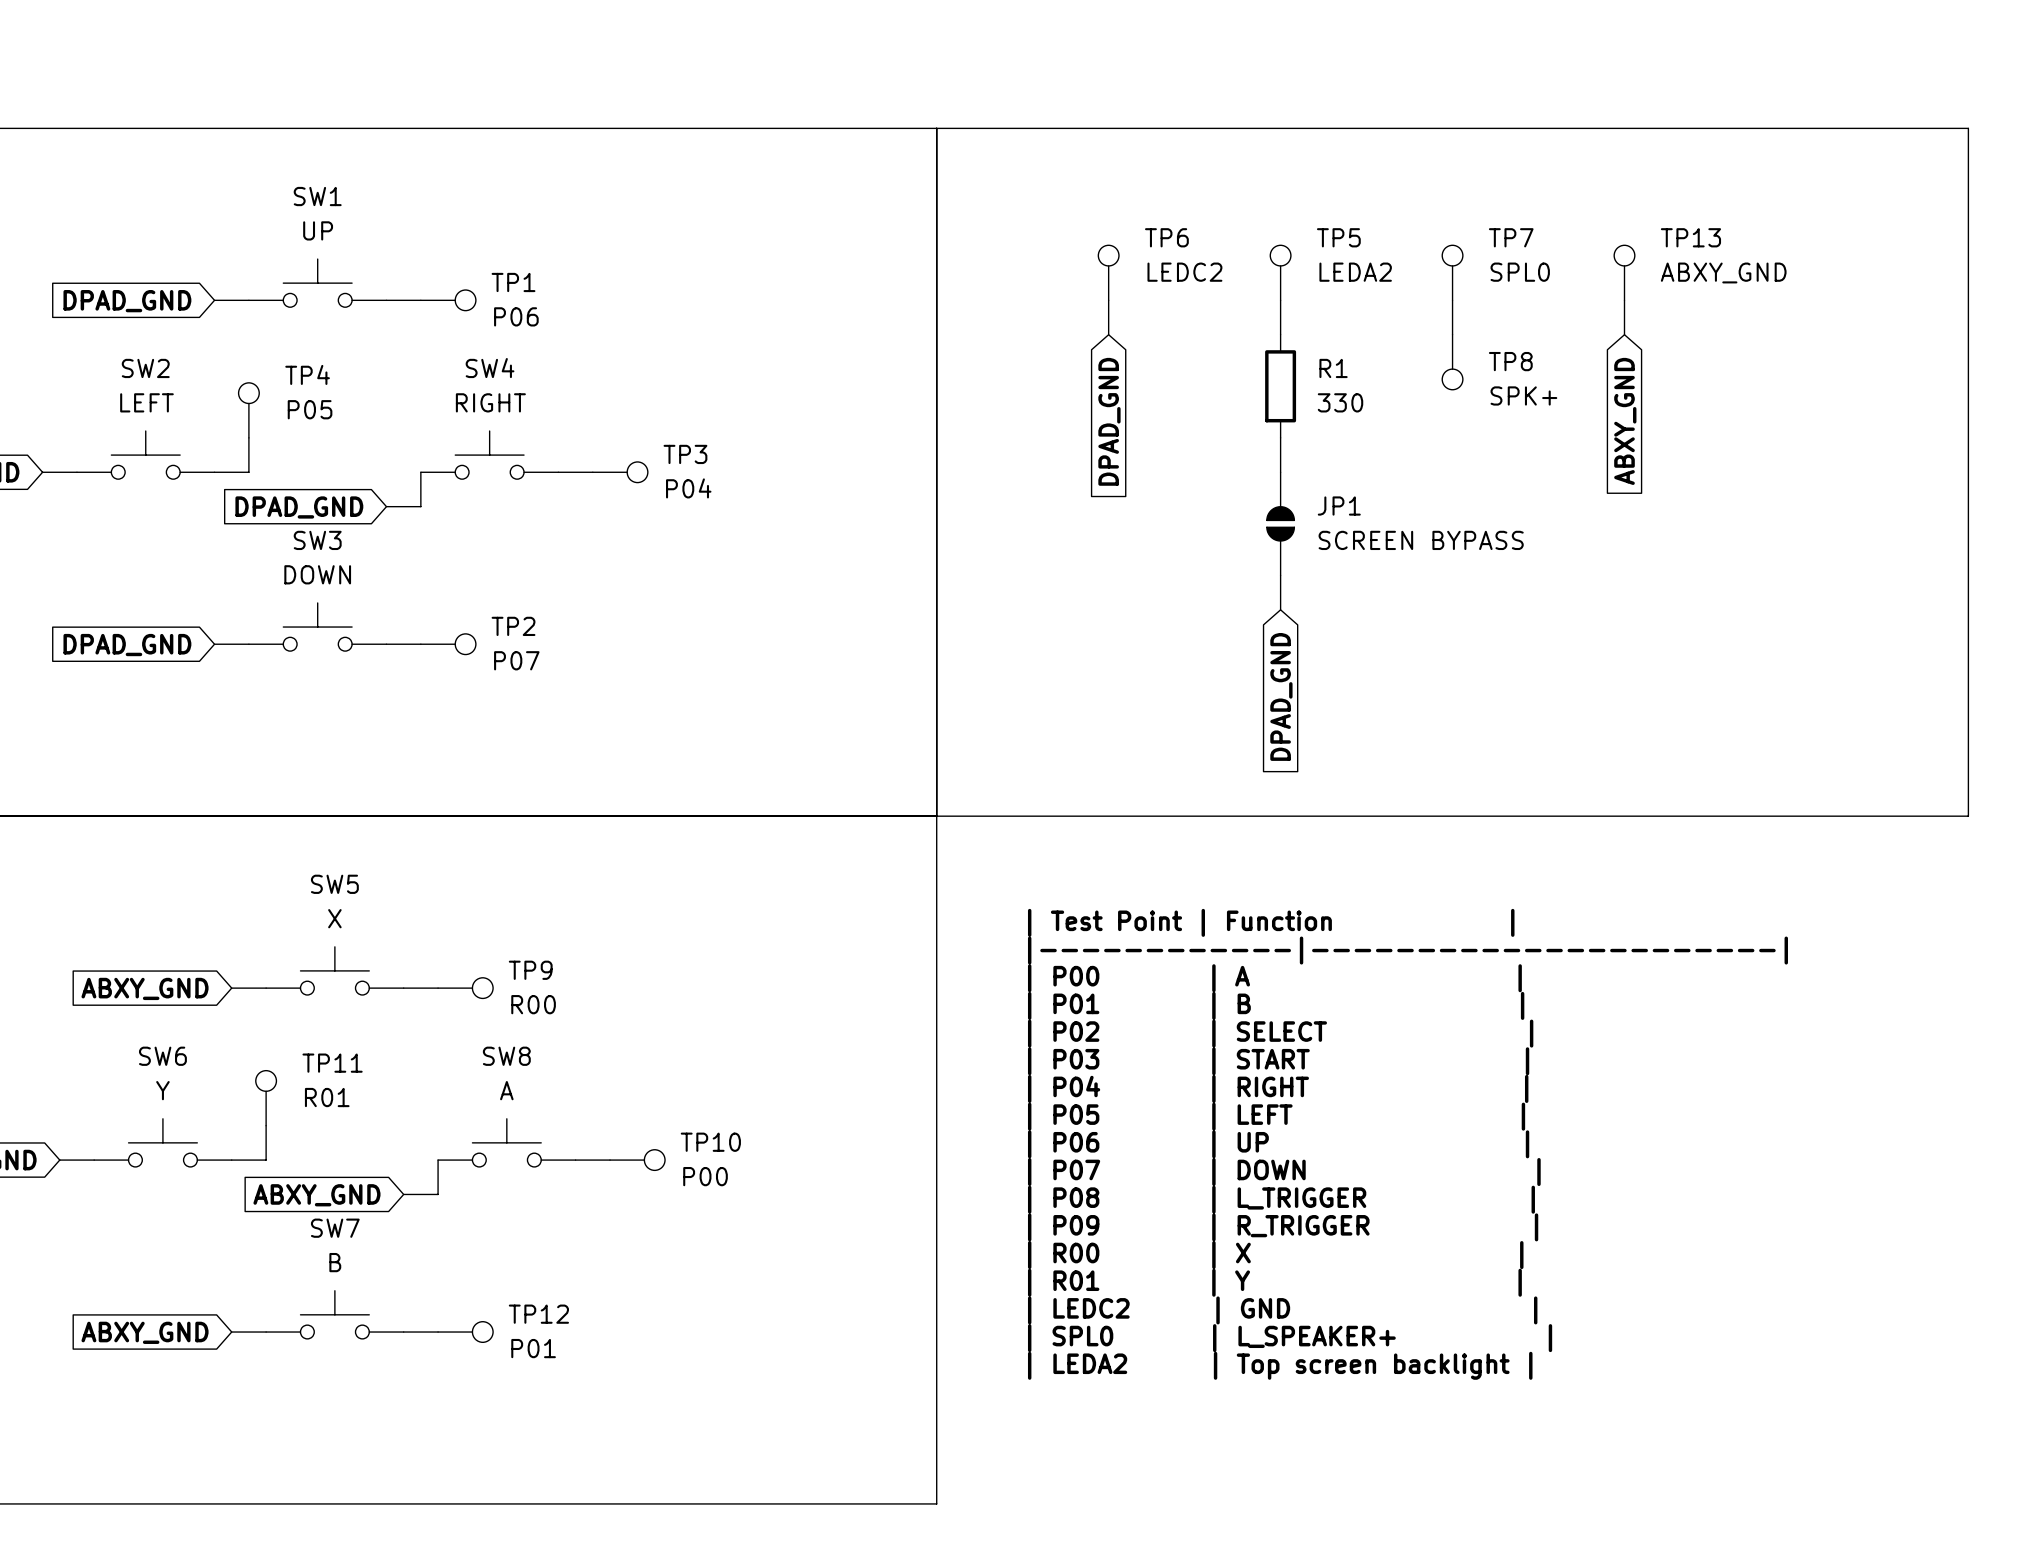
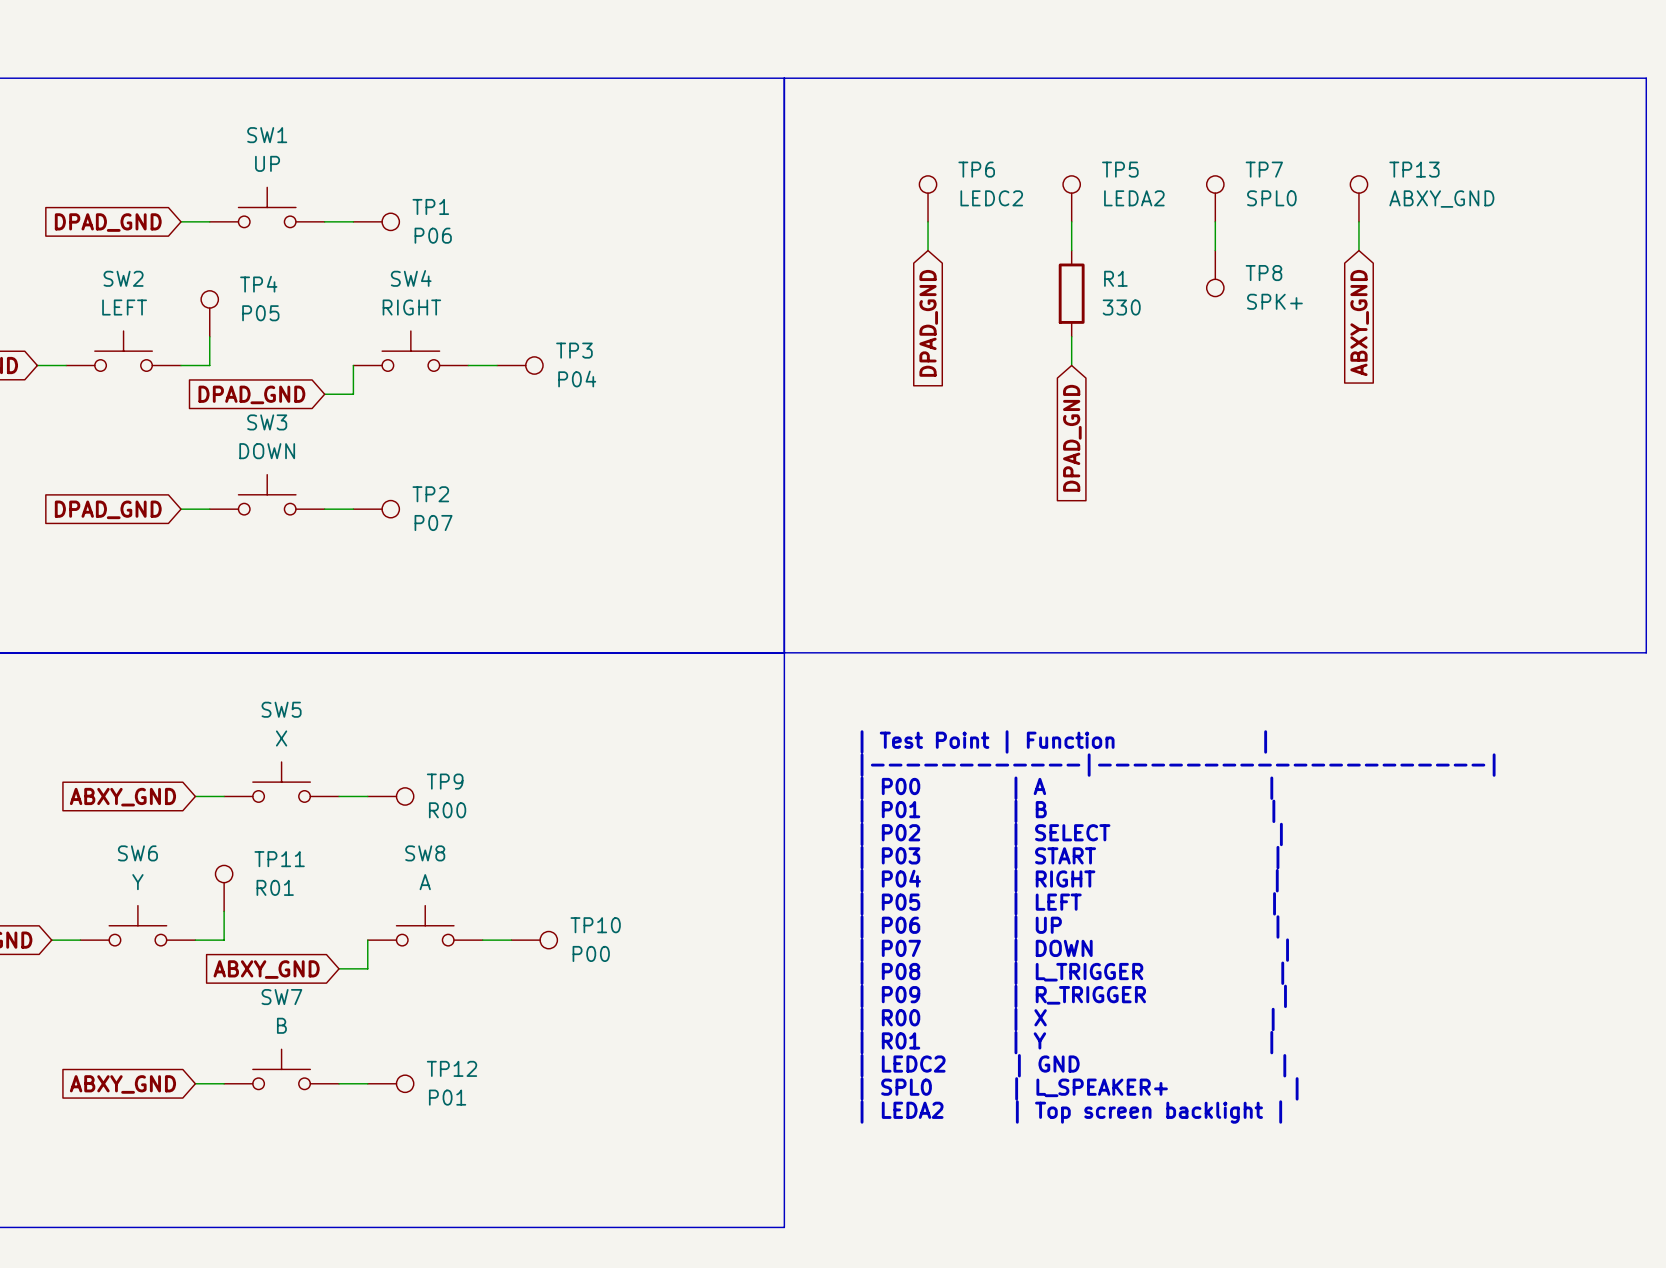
JP1: SCREEN BYPASS (1280, 523) -> none
global label position: DPAD_GND (1281, 696) -> DPAD_GND (1072, 438)

